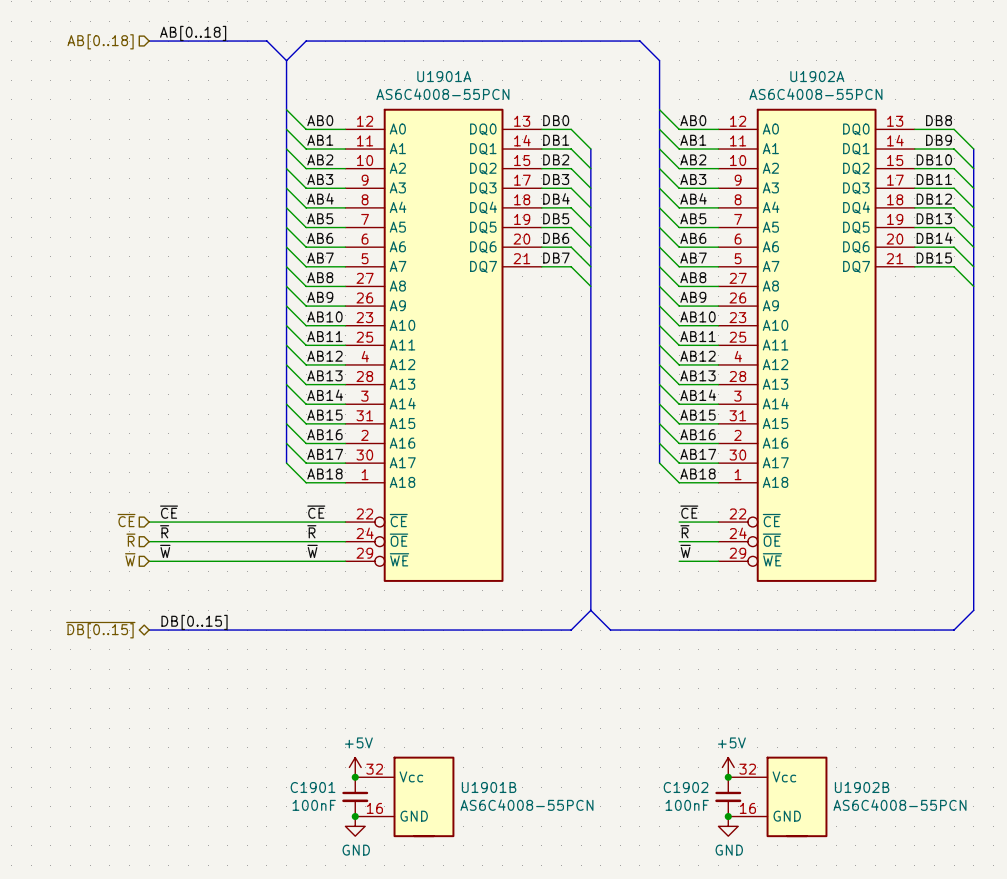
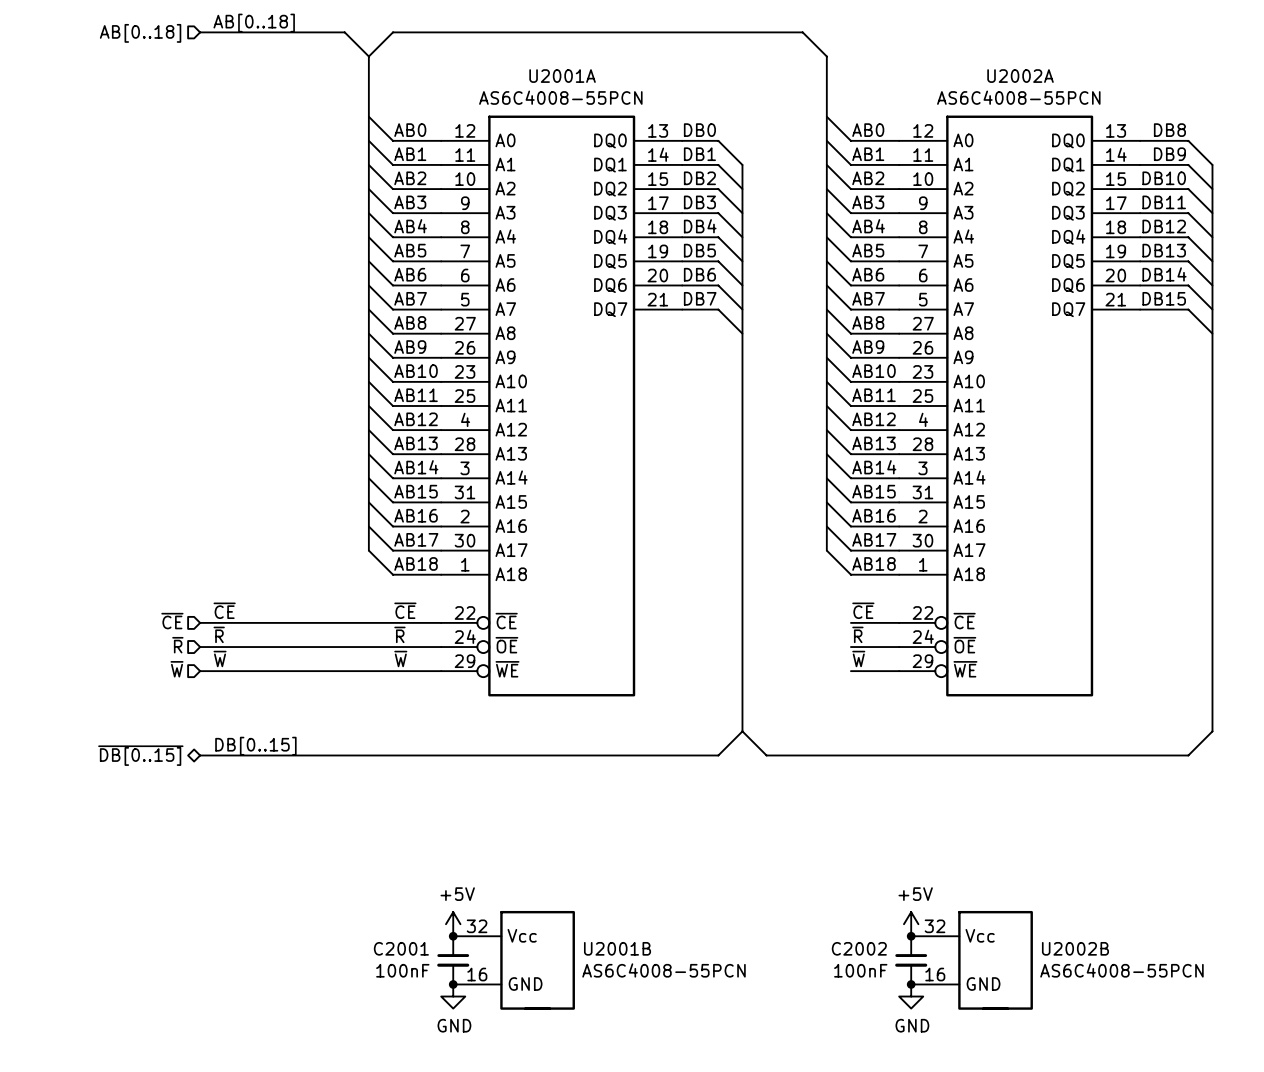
U1901A name: U1901A (444, 76) -> U2001A (562, 76)
U1902A name: U1902A (817, 76) -> U2002A (1020, 76)
C1901 name: C1901 (313, 787) -> C2001 (401, 948)
U1901B name: U1901B (489, 787) -> U2001B (617, 948)
C1902 name: C1902 (686, 787) -> C2002 (859, 948)
U1902B name: U1902B (862, 787) -> U2002B (1075, 948)

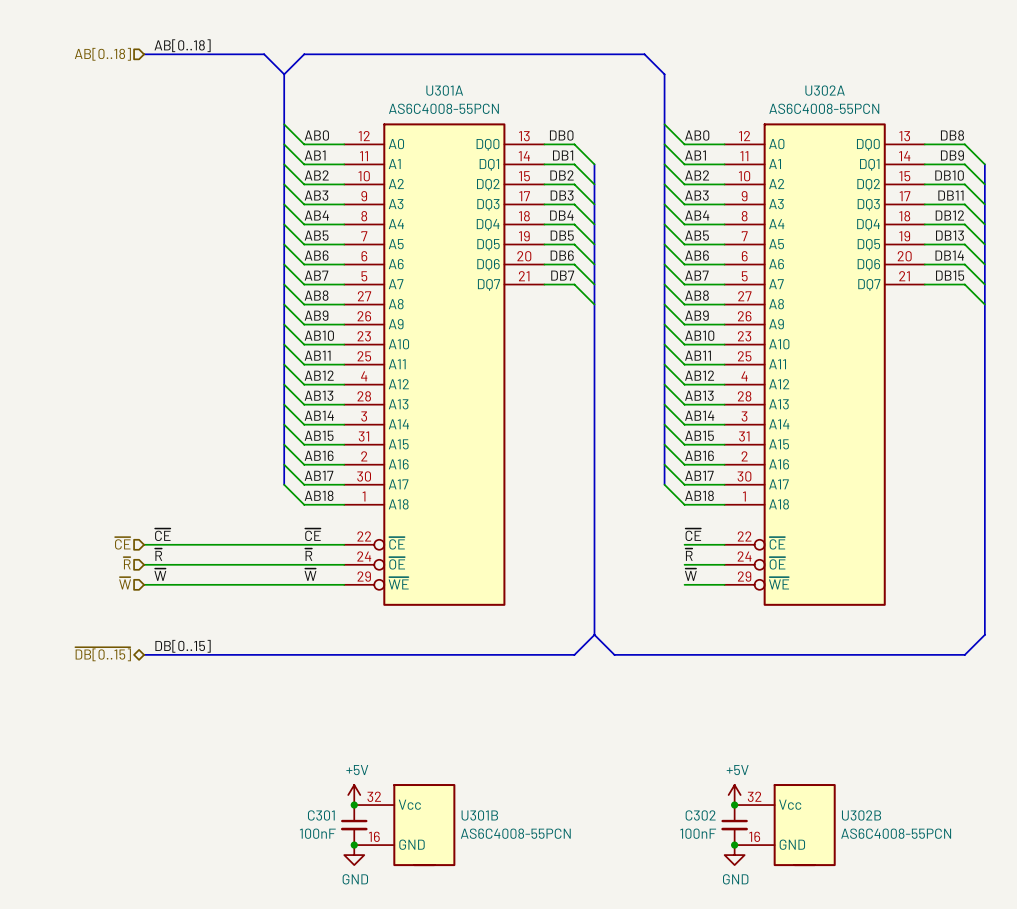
U2001A name: U2001A (562, 76) -> U301A (444, 90)
U2002A name: U2002A (1020, 76) -> U302A (825, 90)
C2001 name: C2001 (401, 948) -> C301 (321, 815)
U2001B name: U2001B (617, 948) -> U301B (479, 815)
C2002 name: C2002 (859, 948) -> C302 (700, 815)
U2002B name: U2002B (1075, 948) -> U302B (861, 815)

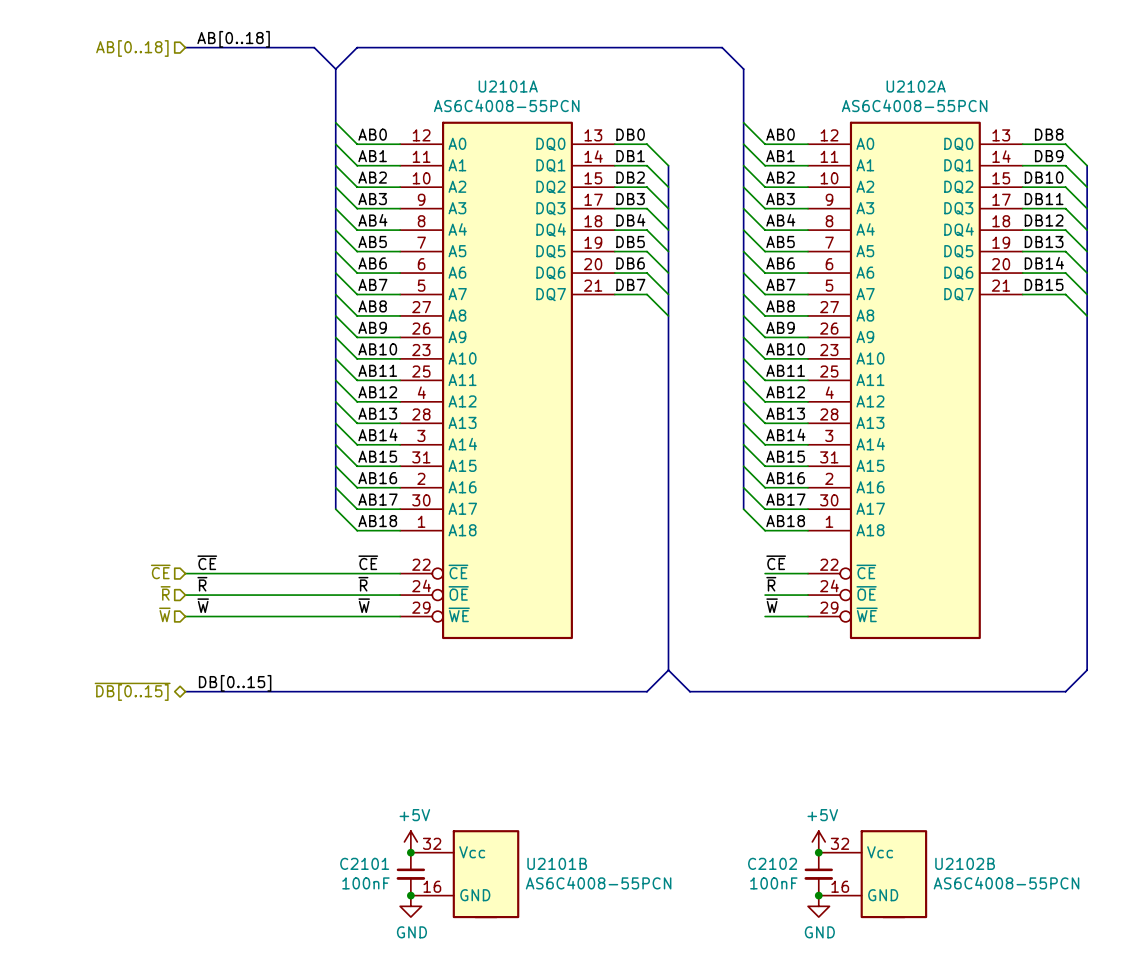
U301A name: U301A (444, 90) -> U2101A (508, 86)
U302A name: U302A (825, 90) -> U2102A (916, 86)
C301 name: C301 (321, 815) -> C2101 (364, 863)
U301B name: U301B (479, 815) -> U2101B (557, 863)
C302 name: C302 (700, 815) -> C2102 (772, 863)
U302B name: U302B (861, 815) -> U2102B (965, 863)

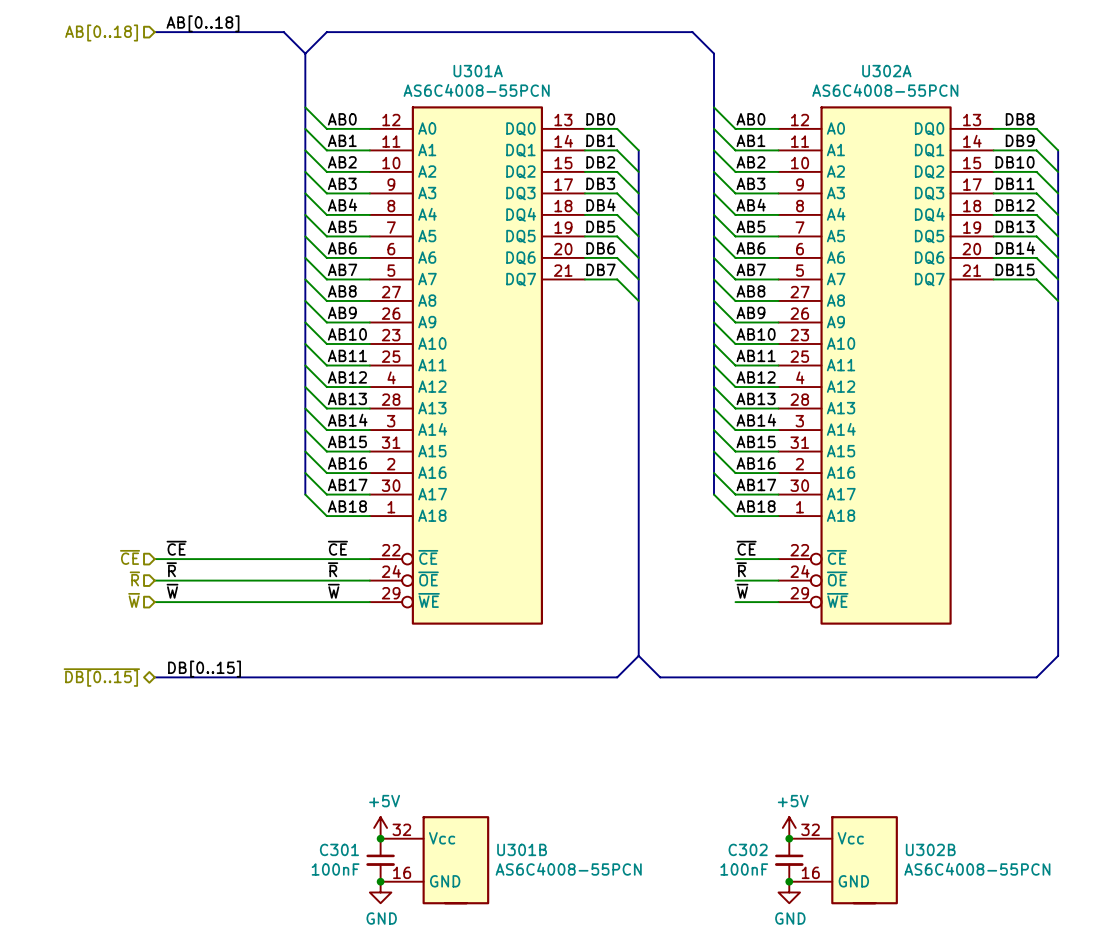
U2101A name: U2101A (508, 86) -> U301A (478, 71)
U2102A name: U2102A (916, 86) -> U302A (886, 71)
C2101 name: C2101 (364, 863) -> C301 (339, 849)
U2101B name: U2101B (557, 863) -> U301B (522, 849)
C2102 name: C2102 (772, 863) -> C302 (748, 849)
U2102B name: U2102B (965, 863) -> U302B (930, 849)

